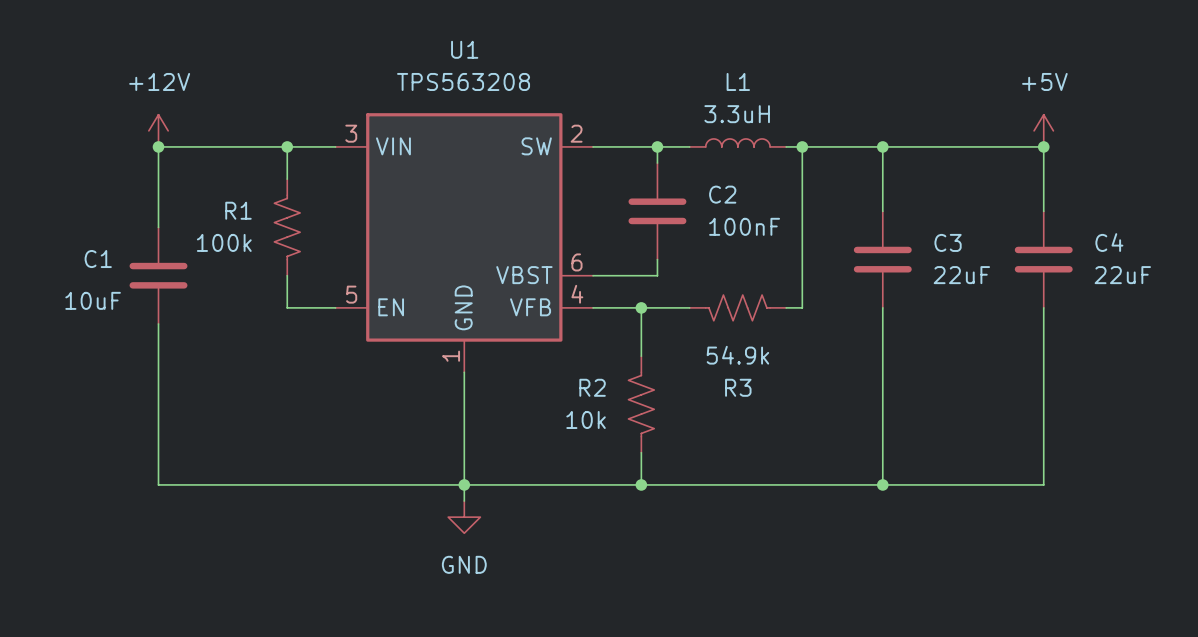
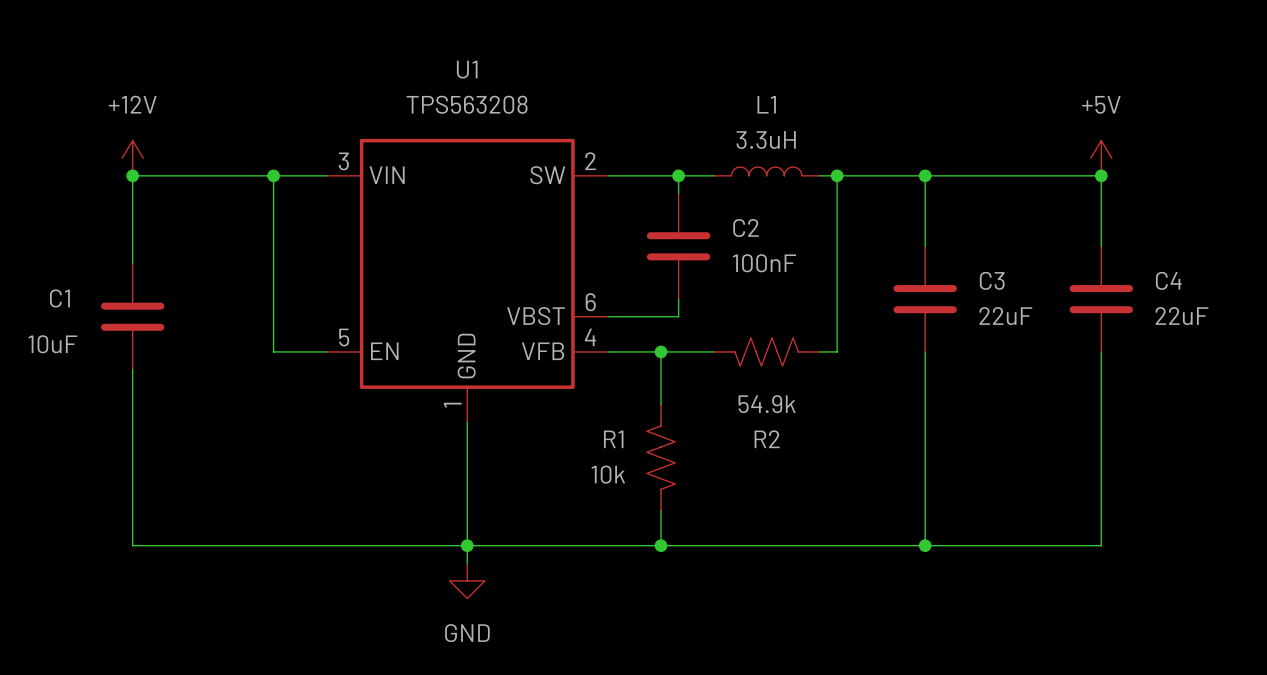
wire: none -> (273, 211) (273, 316)
R1: 100k (287, 227) -> none
R2 name: R2 (592, 387) -> R1 (613, 439)
R3 name: R3 (738, 387) -> R2 (767, 439)

